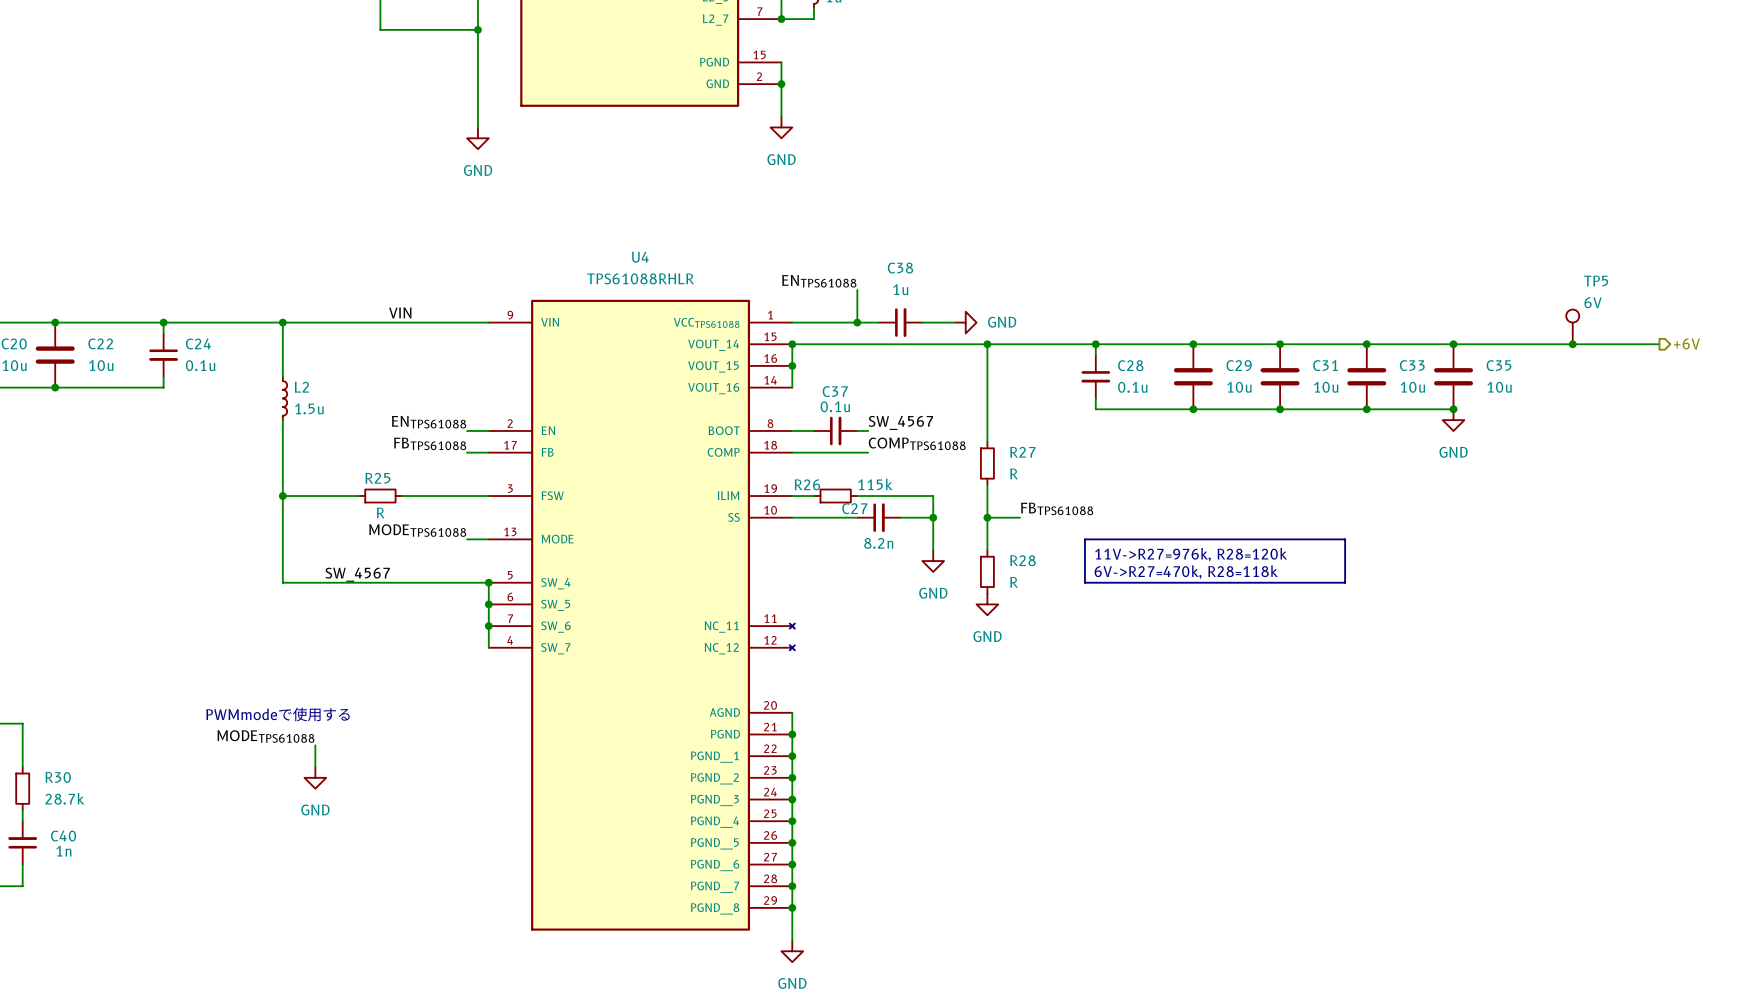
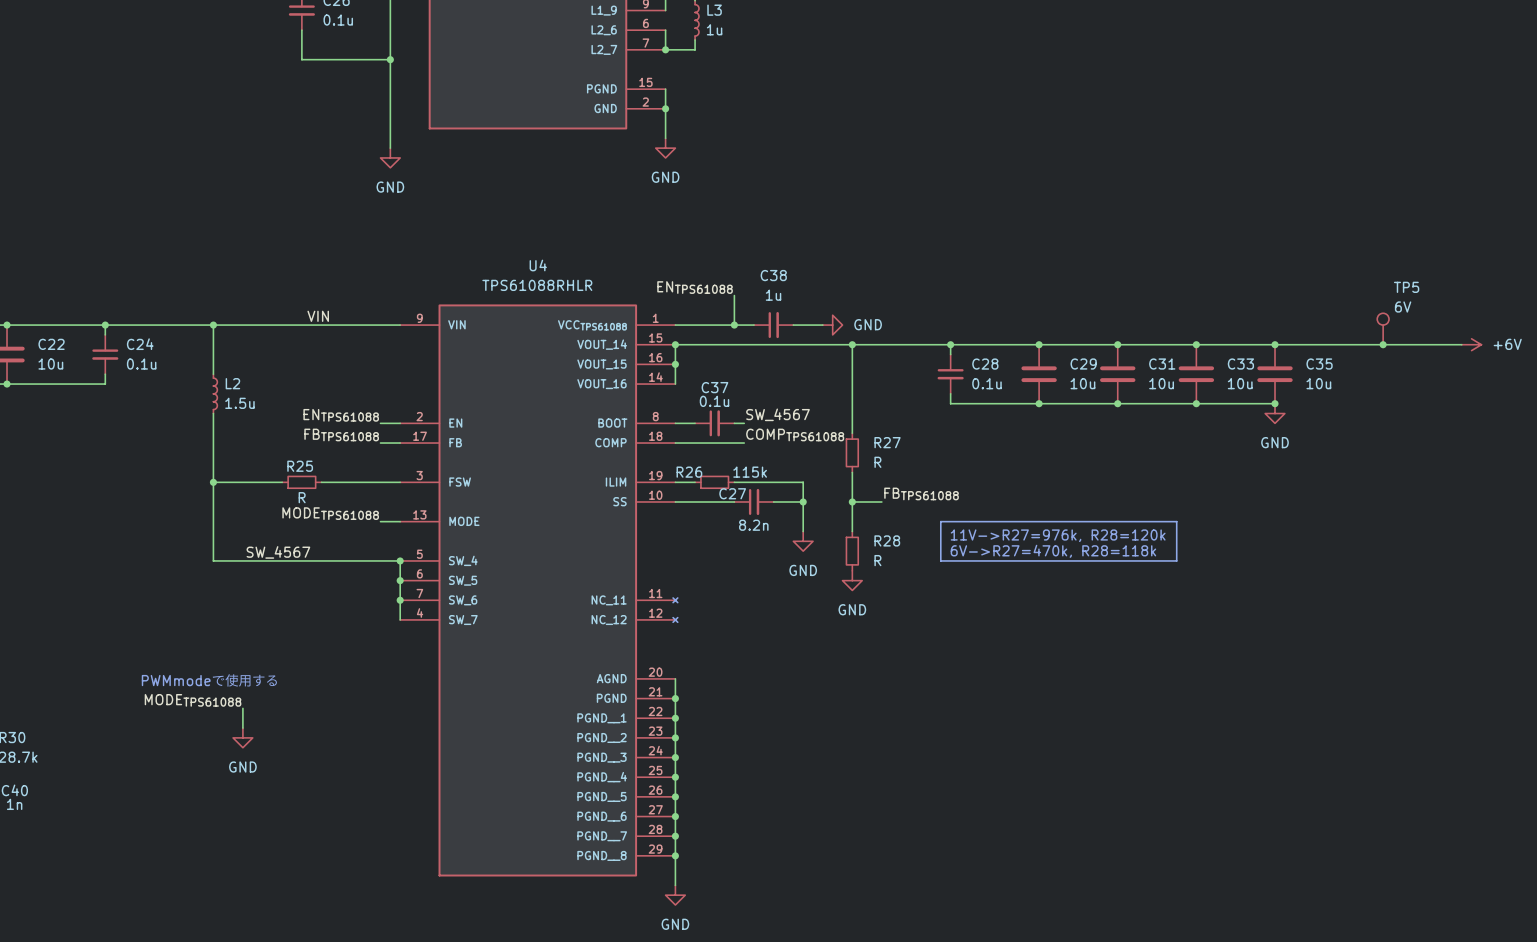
hierarchical label: +6V (1686, 343) -> none
power symbol: none -> +6V (1471, 344)

